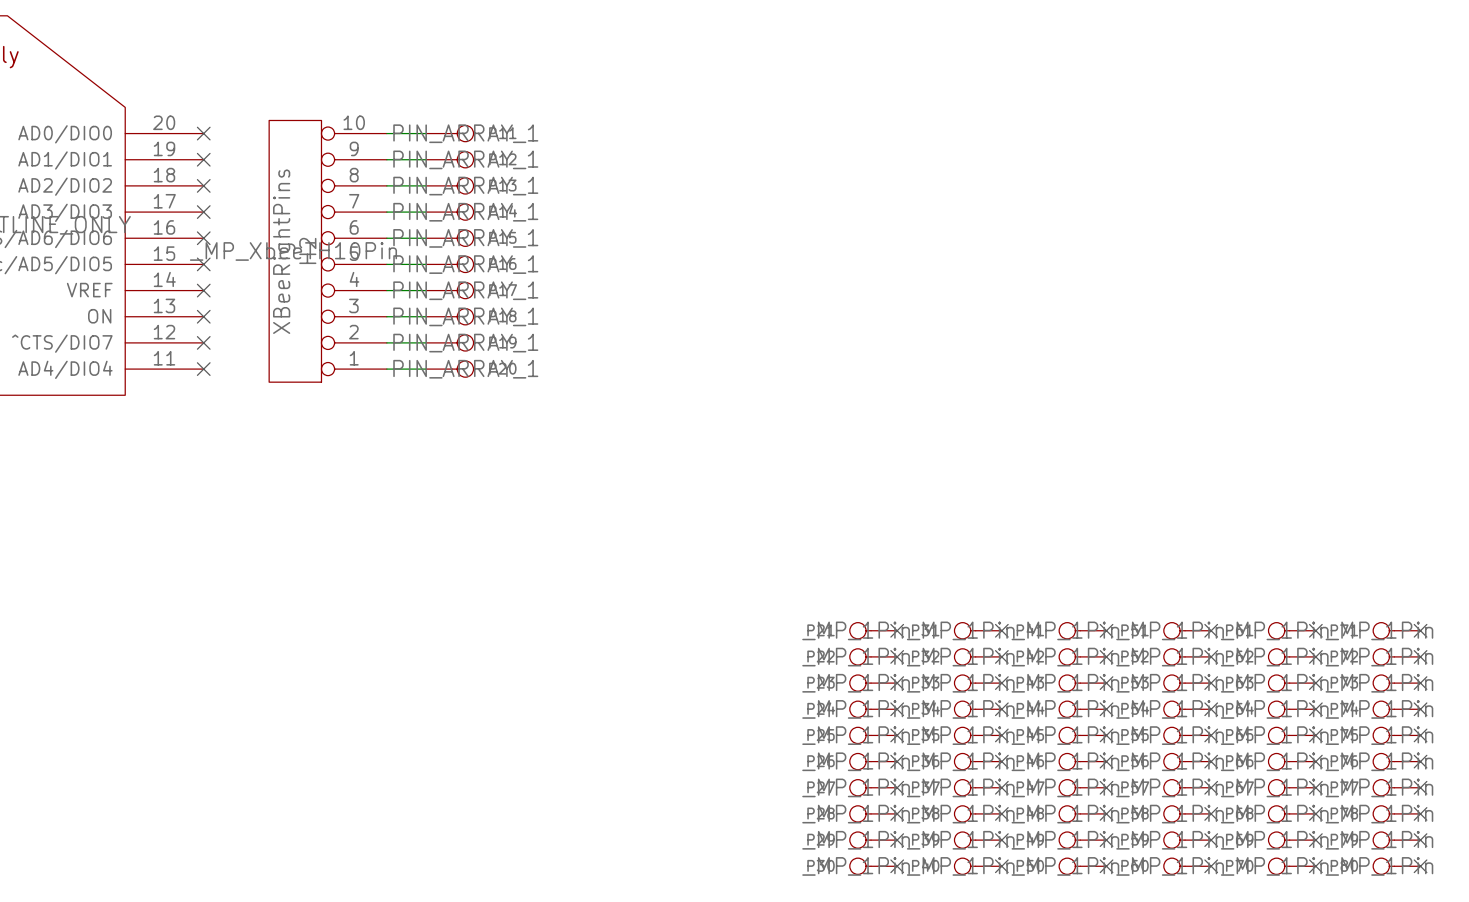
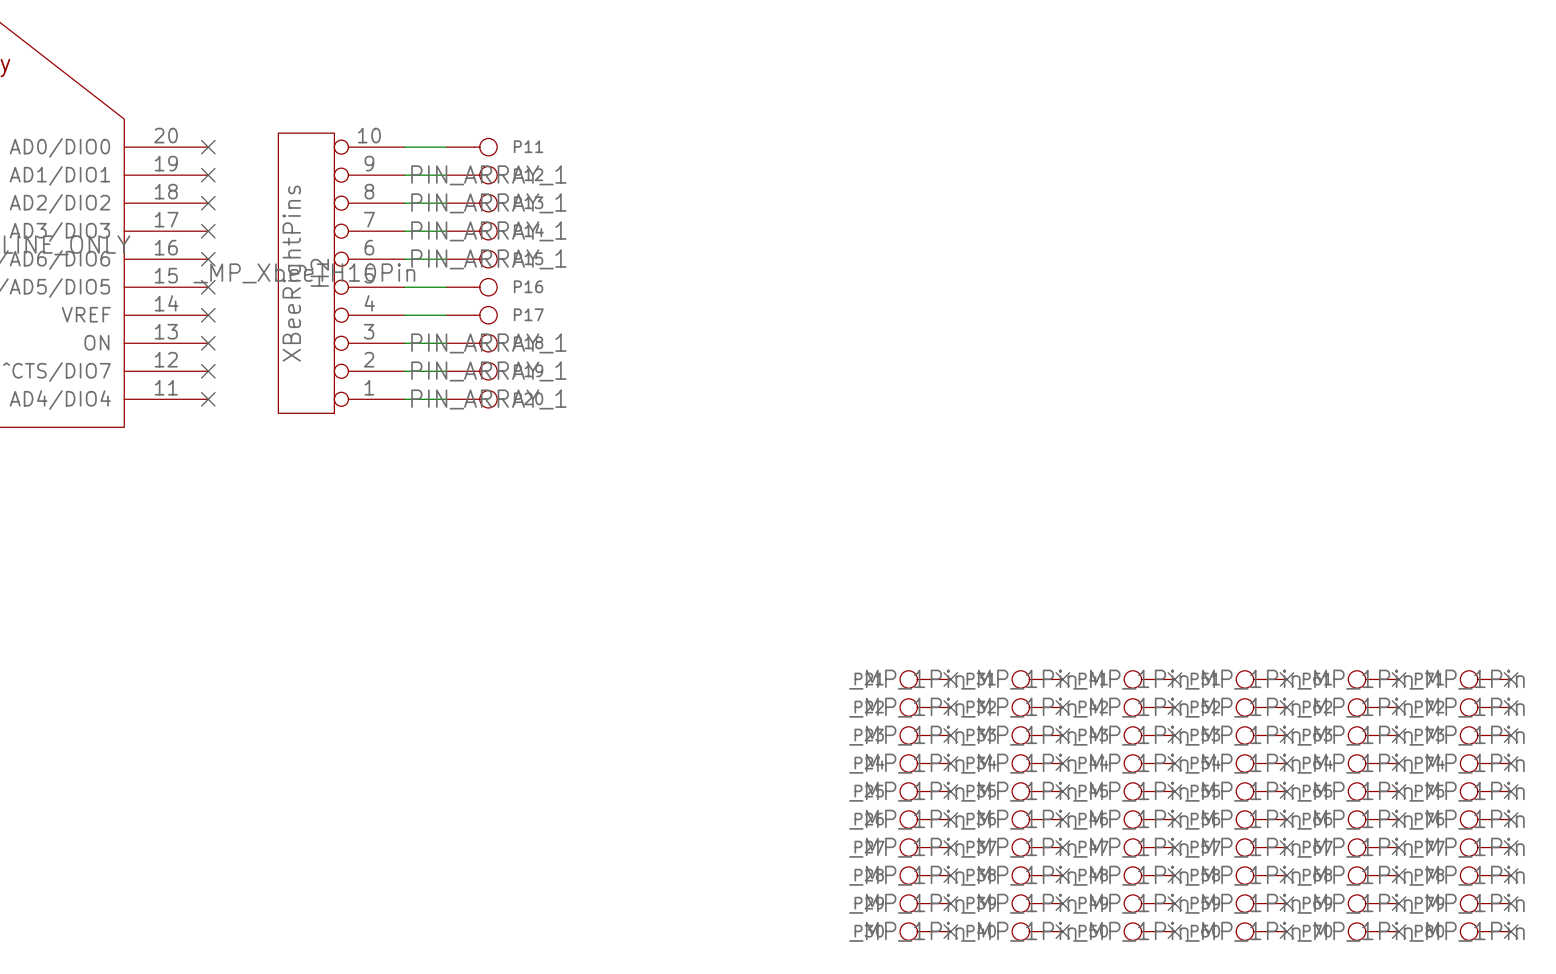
P11 text: PIN_ARRAY_1 (465, 133) -> none
P16 text: PIN_ARRAY_1 (465, 264) -> none
P17 text: PIN_ARRAY_1 (465, 290) -> none

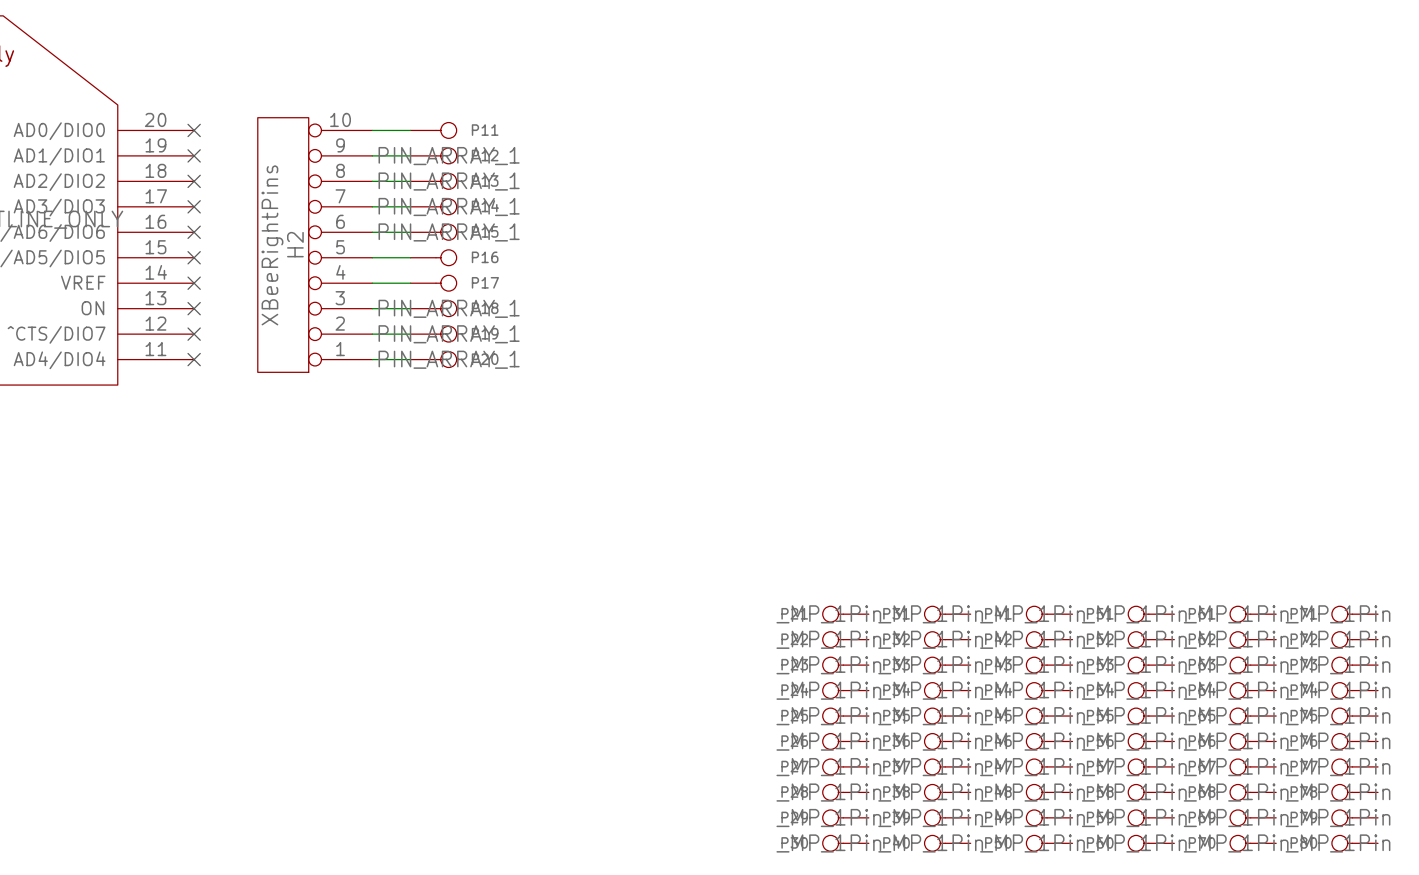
H2 text: _MP_XbeeTH10Pin (304, 273) -> none
no-connect mark: (950, 679) -> none
no-connect mark: (1062, 679) -> none
no-connect mark: (1174, 679) -> none
no-connect mark: (1286, 679) -> none
no-connect mark: (1399, 679) -> none
no-connect mark: (1511, 679) -> none
no-connect mark: (950, 707) -> none
no-connect mark: (1062, 707) -> none
no-connect mark: (1174, 707) -> none
no-connect mark: (1286, 707) -> none
no-connect mark: (1399, 707) -> none
no-connect mark: (1511, 707) -> none
no-connect mark: (950, 735) -> none
no-connect mark: (1062, 735) -> none
no-connect mark: (1174, 735) -> none
no-connect mark: (1286, 735) -> none
no-connect mark: (1399, 735) -> none
no-connect mark: (1511, 735) -> none
no-connect mark: (950, 763) -> none
no-connect mark: (1062, 763) -> none
no-connect mark: (1174, 763) -> none
no-connect mark: (1286, 763) -> none
no-connect mark: (1399, 763) -> none
no-connect mark: (1511, 763) -> none
no-connect mark: (950, 791) -> none
no-connect mark: (1062, 791) -> none
no-connect mark: (1174, 791) -> none
no-connect mark: (1286, 791) -> none
no-connect mark: (1399, 791) -> none
no-connect mark: (1511, 791) -> none
no-connect mark: (950, 819) -> none
no-connect mark: (1062, 819) -> none
no-connect mark: (1174, 819) -> none
no-connect mark: (1286, 819) -> none
no-connect mark: (1399, 819) -> none
no-connect mark: (1511, 819) -> none
no-connect mark: (950, 847) -> none
no-connect mark: (1062, 847) -> none
no-connect mark: (1174, 847) -> none
no-connect mark: (1286, 847) -> none
no-connect mark: (1399, 847) -> none
no-connect mark: (1511, 847) -> none
no-connect mark: (950, 875) -> none
no-connect mark: (1062, 875) -> none
no-connect mark: (1174, 875) -> none
no-connect mark: (1286, 875) -> none
no-connect mark: (1399, 875) -> none
no-connect mark: (1511, 875) -> none
no-connect mark: (950, 903) -> none
no-connect mark: (1062, 903) -> none
no-connect mark: (1174, 903) -> none
no-connect mark: (1286, 903) -> none
no-connect mark: (1399, 903) -> none
no-connect mark: (1511, 903) -> none
no-connect mark: (950, 931) -> none
no-connect mark: (1062, 931) -> none
no-connect mark: (1174, 931) -> none
no-connect mark: (1286, 931) -> none
no-connect mark: (1399, 931) -> none
no-connect mark: (1511, 931) -> none

